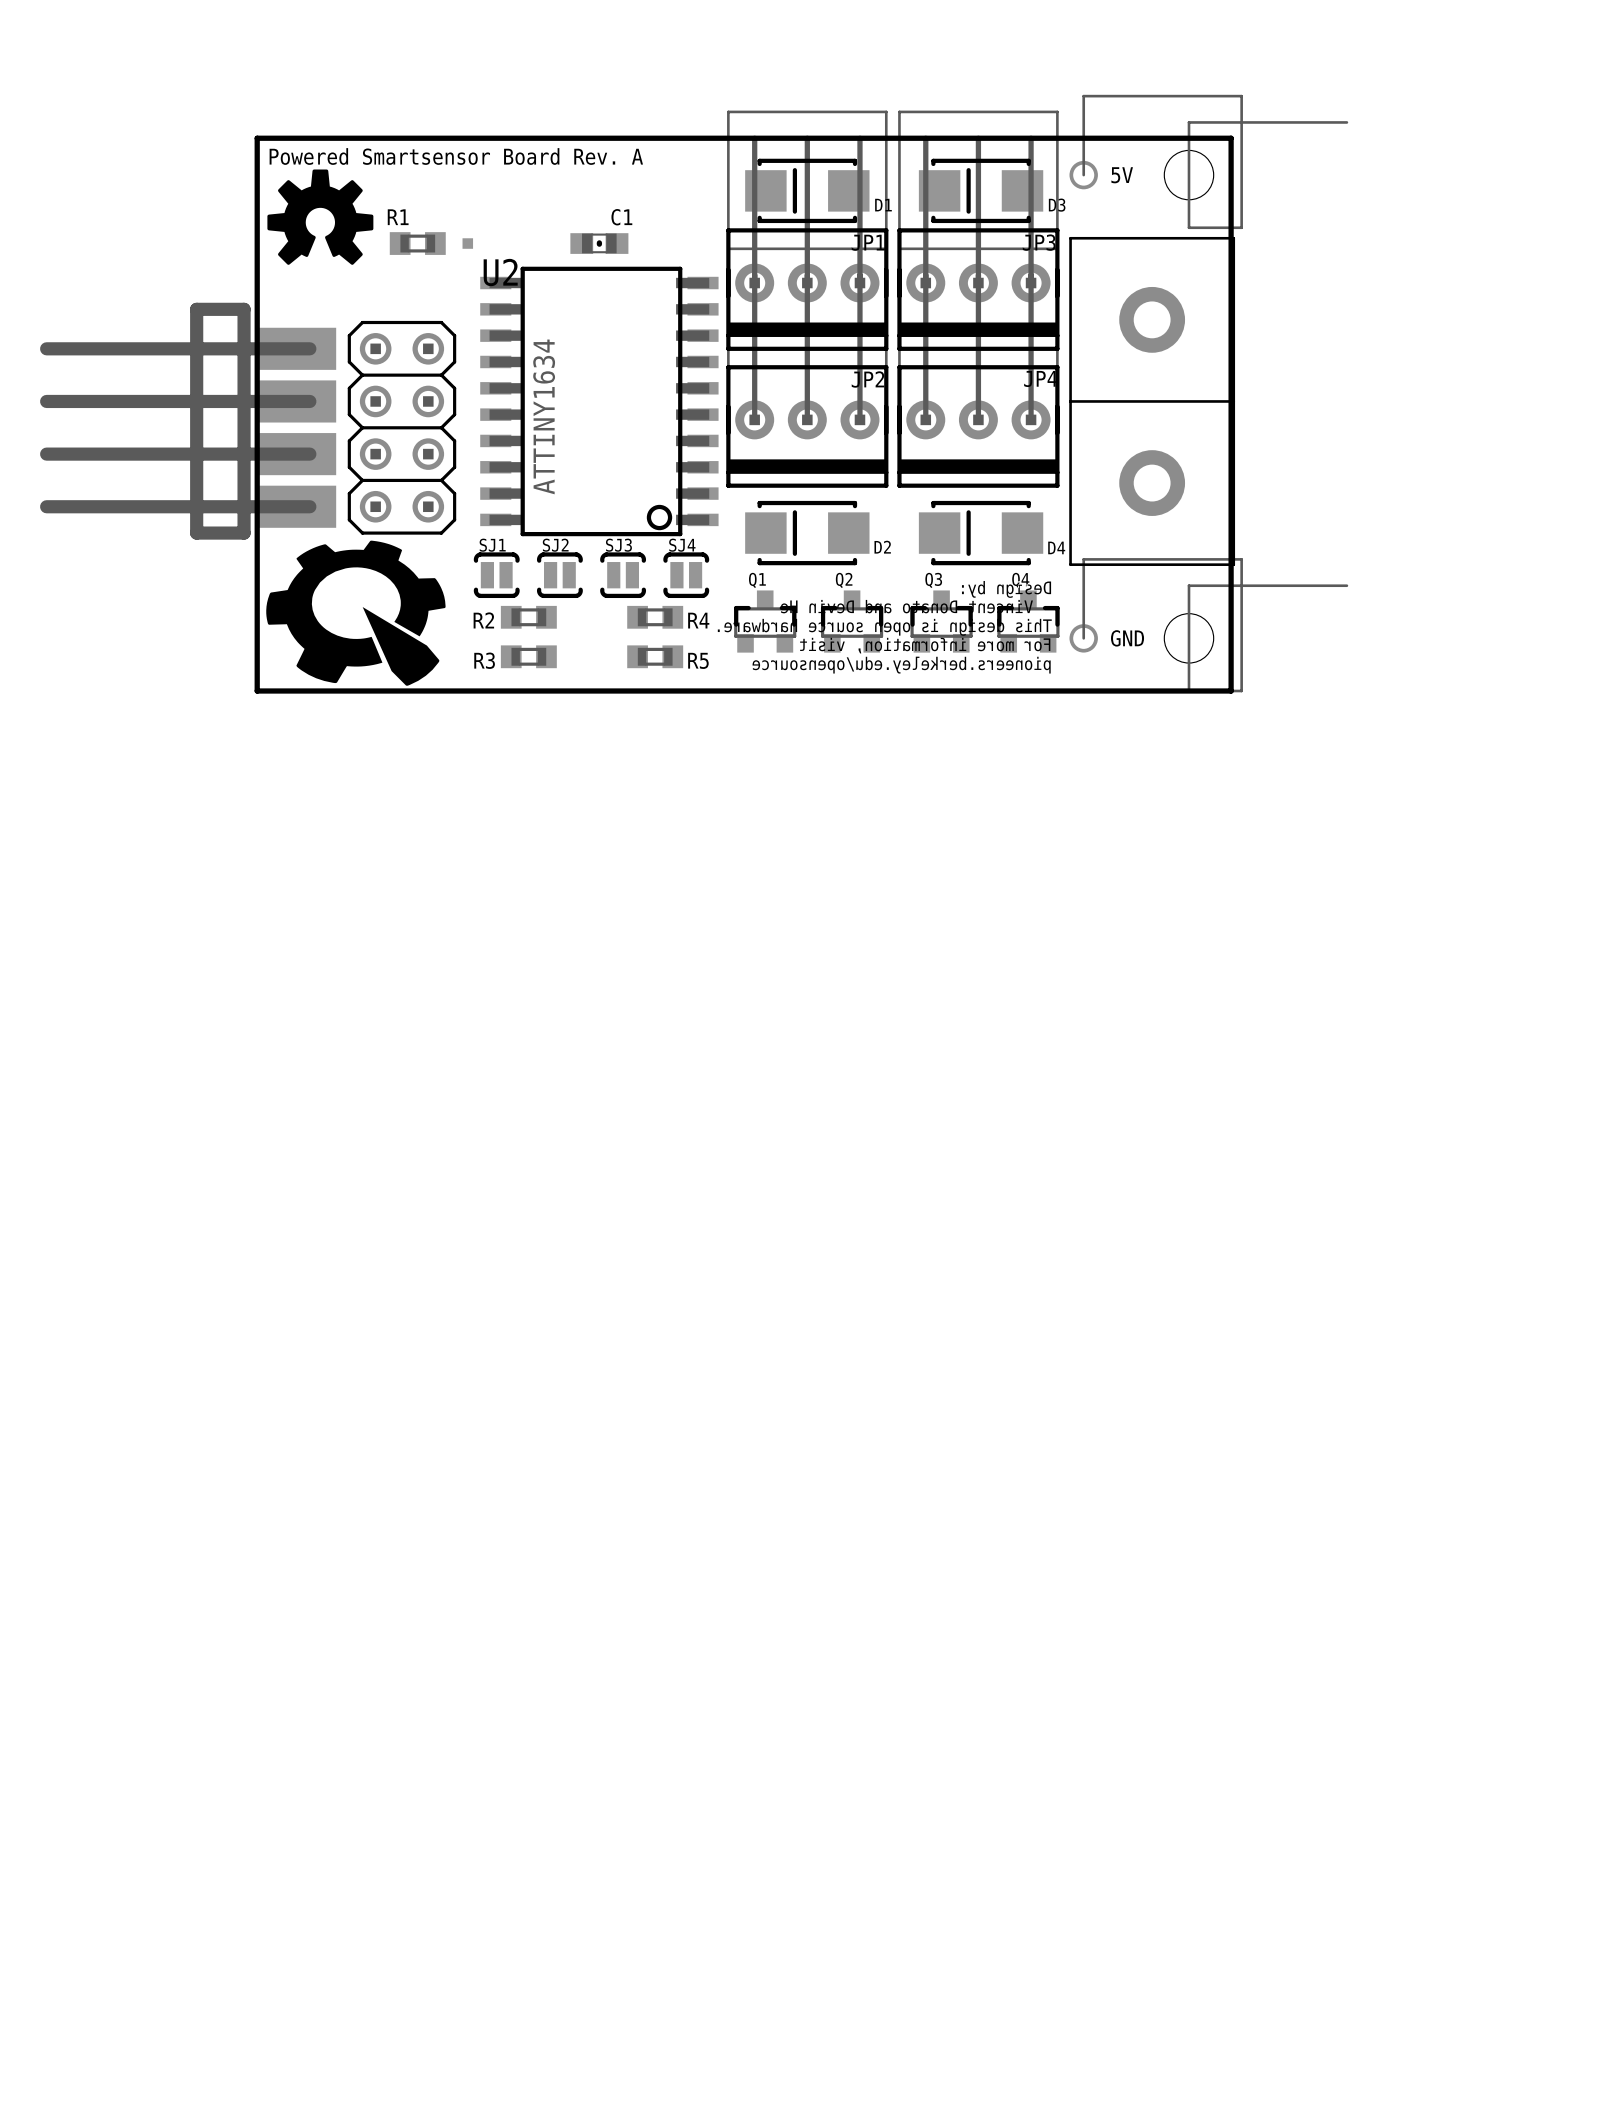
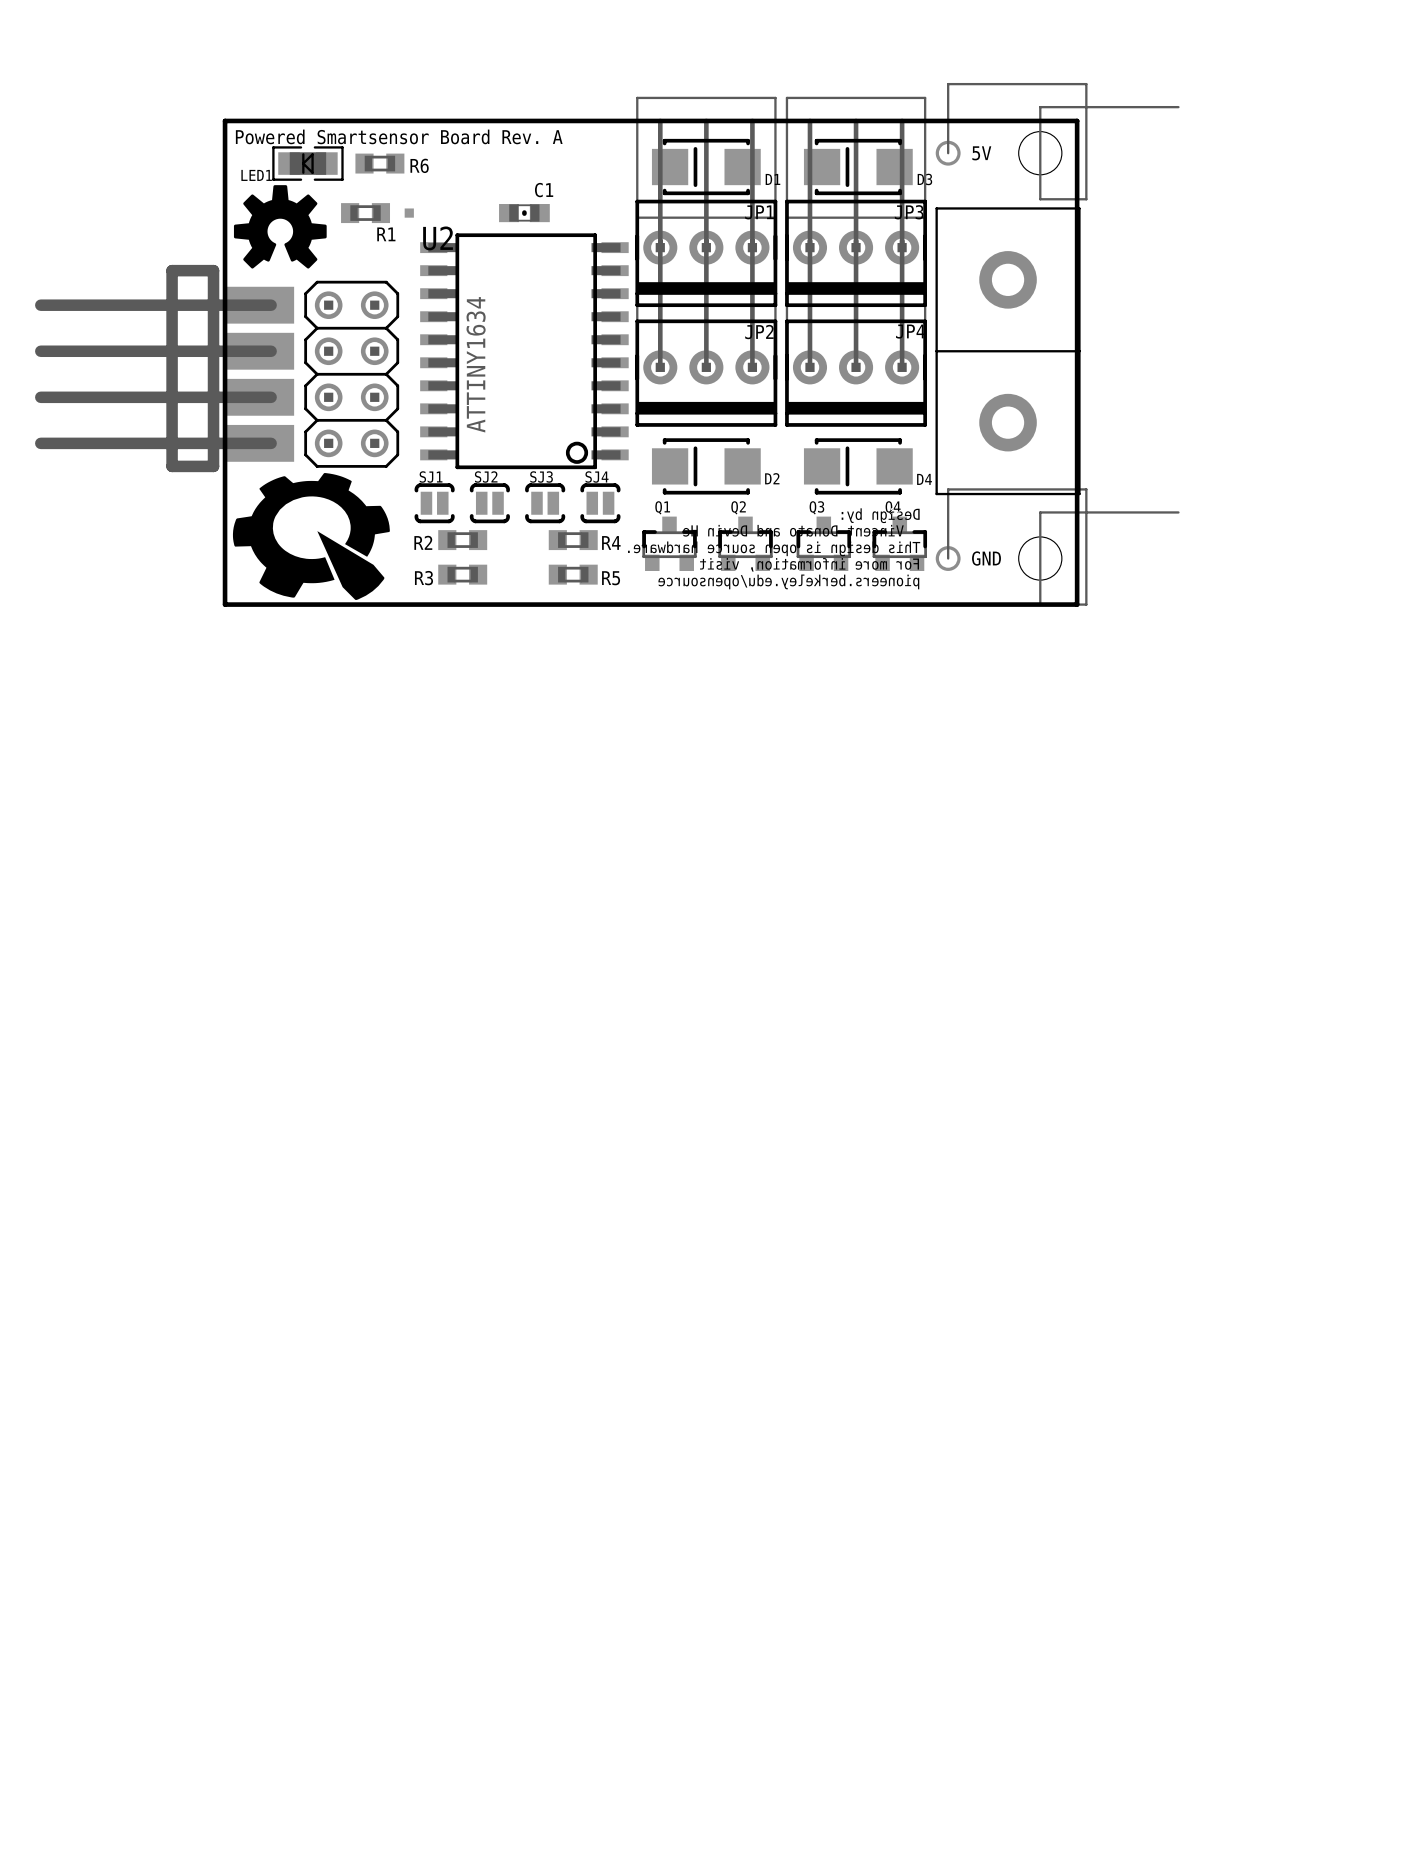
LED1: none -> (307, 163)
R6: none -> (379, 163)
drawing position: (320, 217) -> (280, 226)
R1 name position: R1 (398, 217) -> R1 (386, 234)

